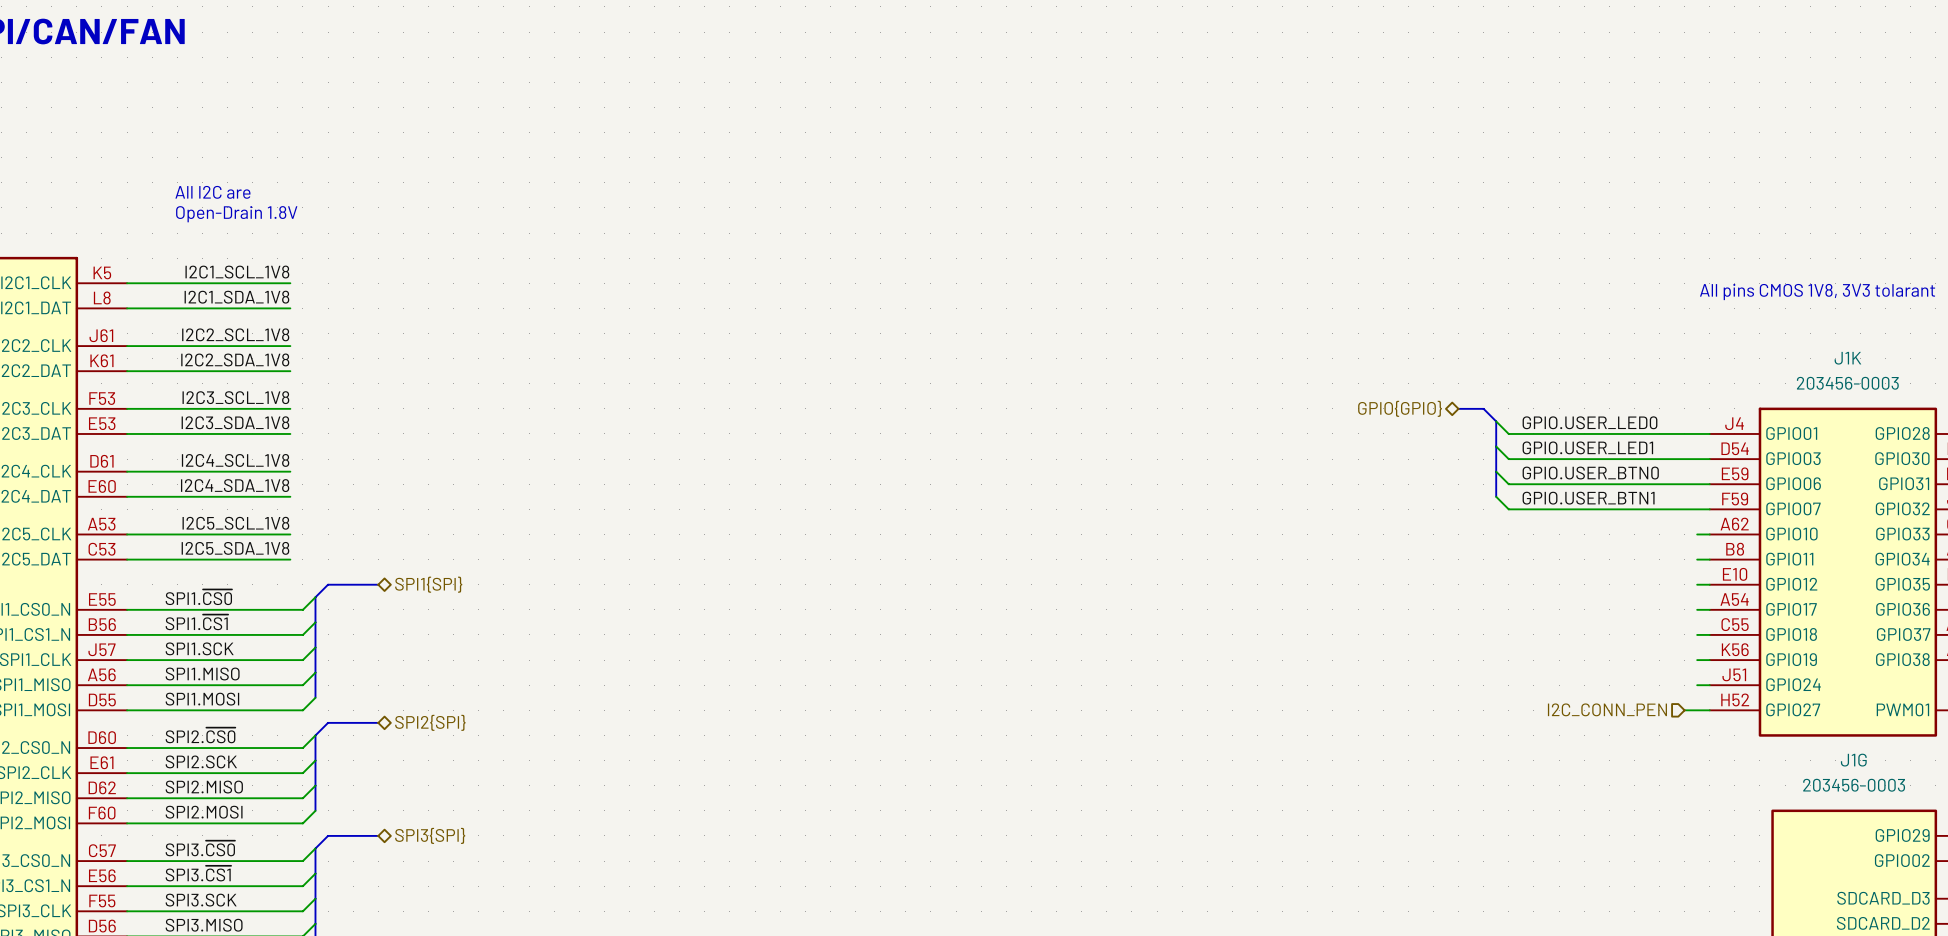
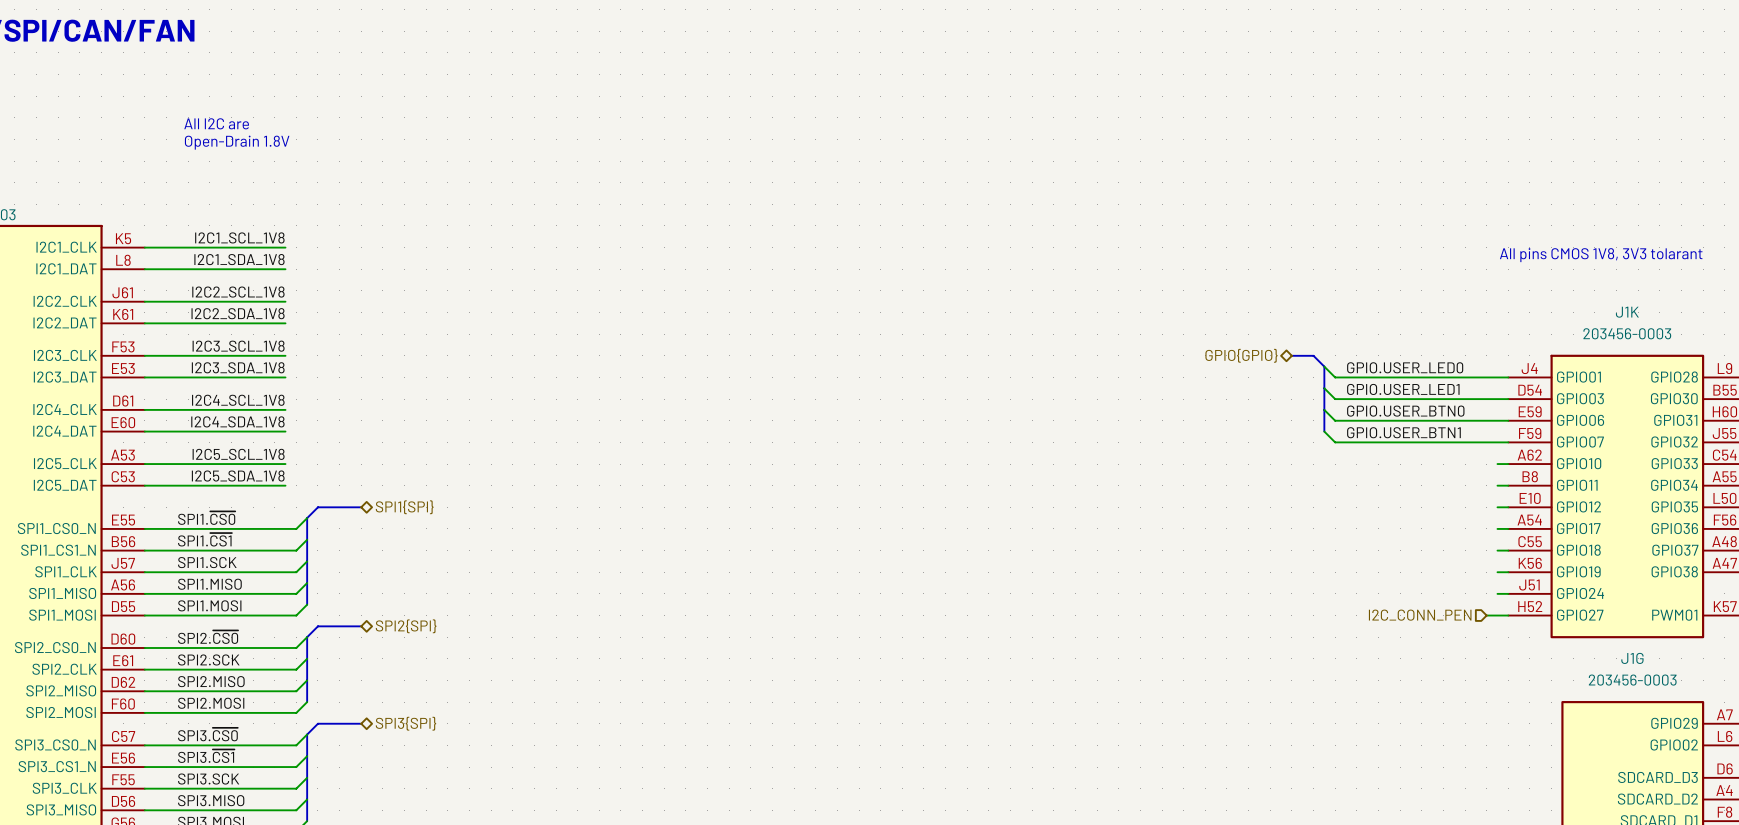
text position: All I2C are (212, 192) -> All I2C are (216, 123)
text position: Open-Drain 1.8V (236, 214) -> Open-Drain 1.8V (237, 142)

